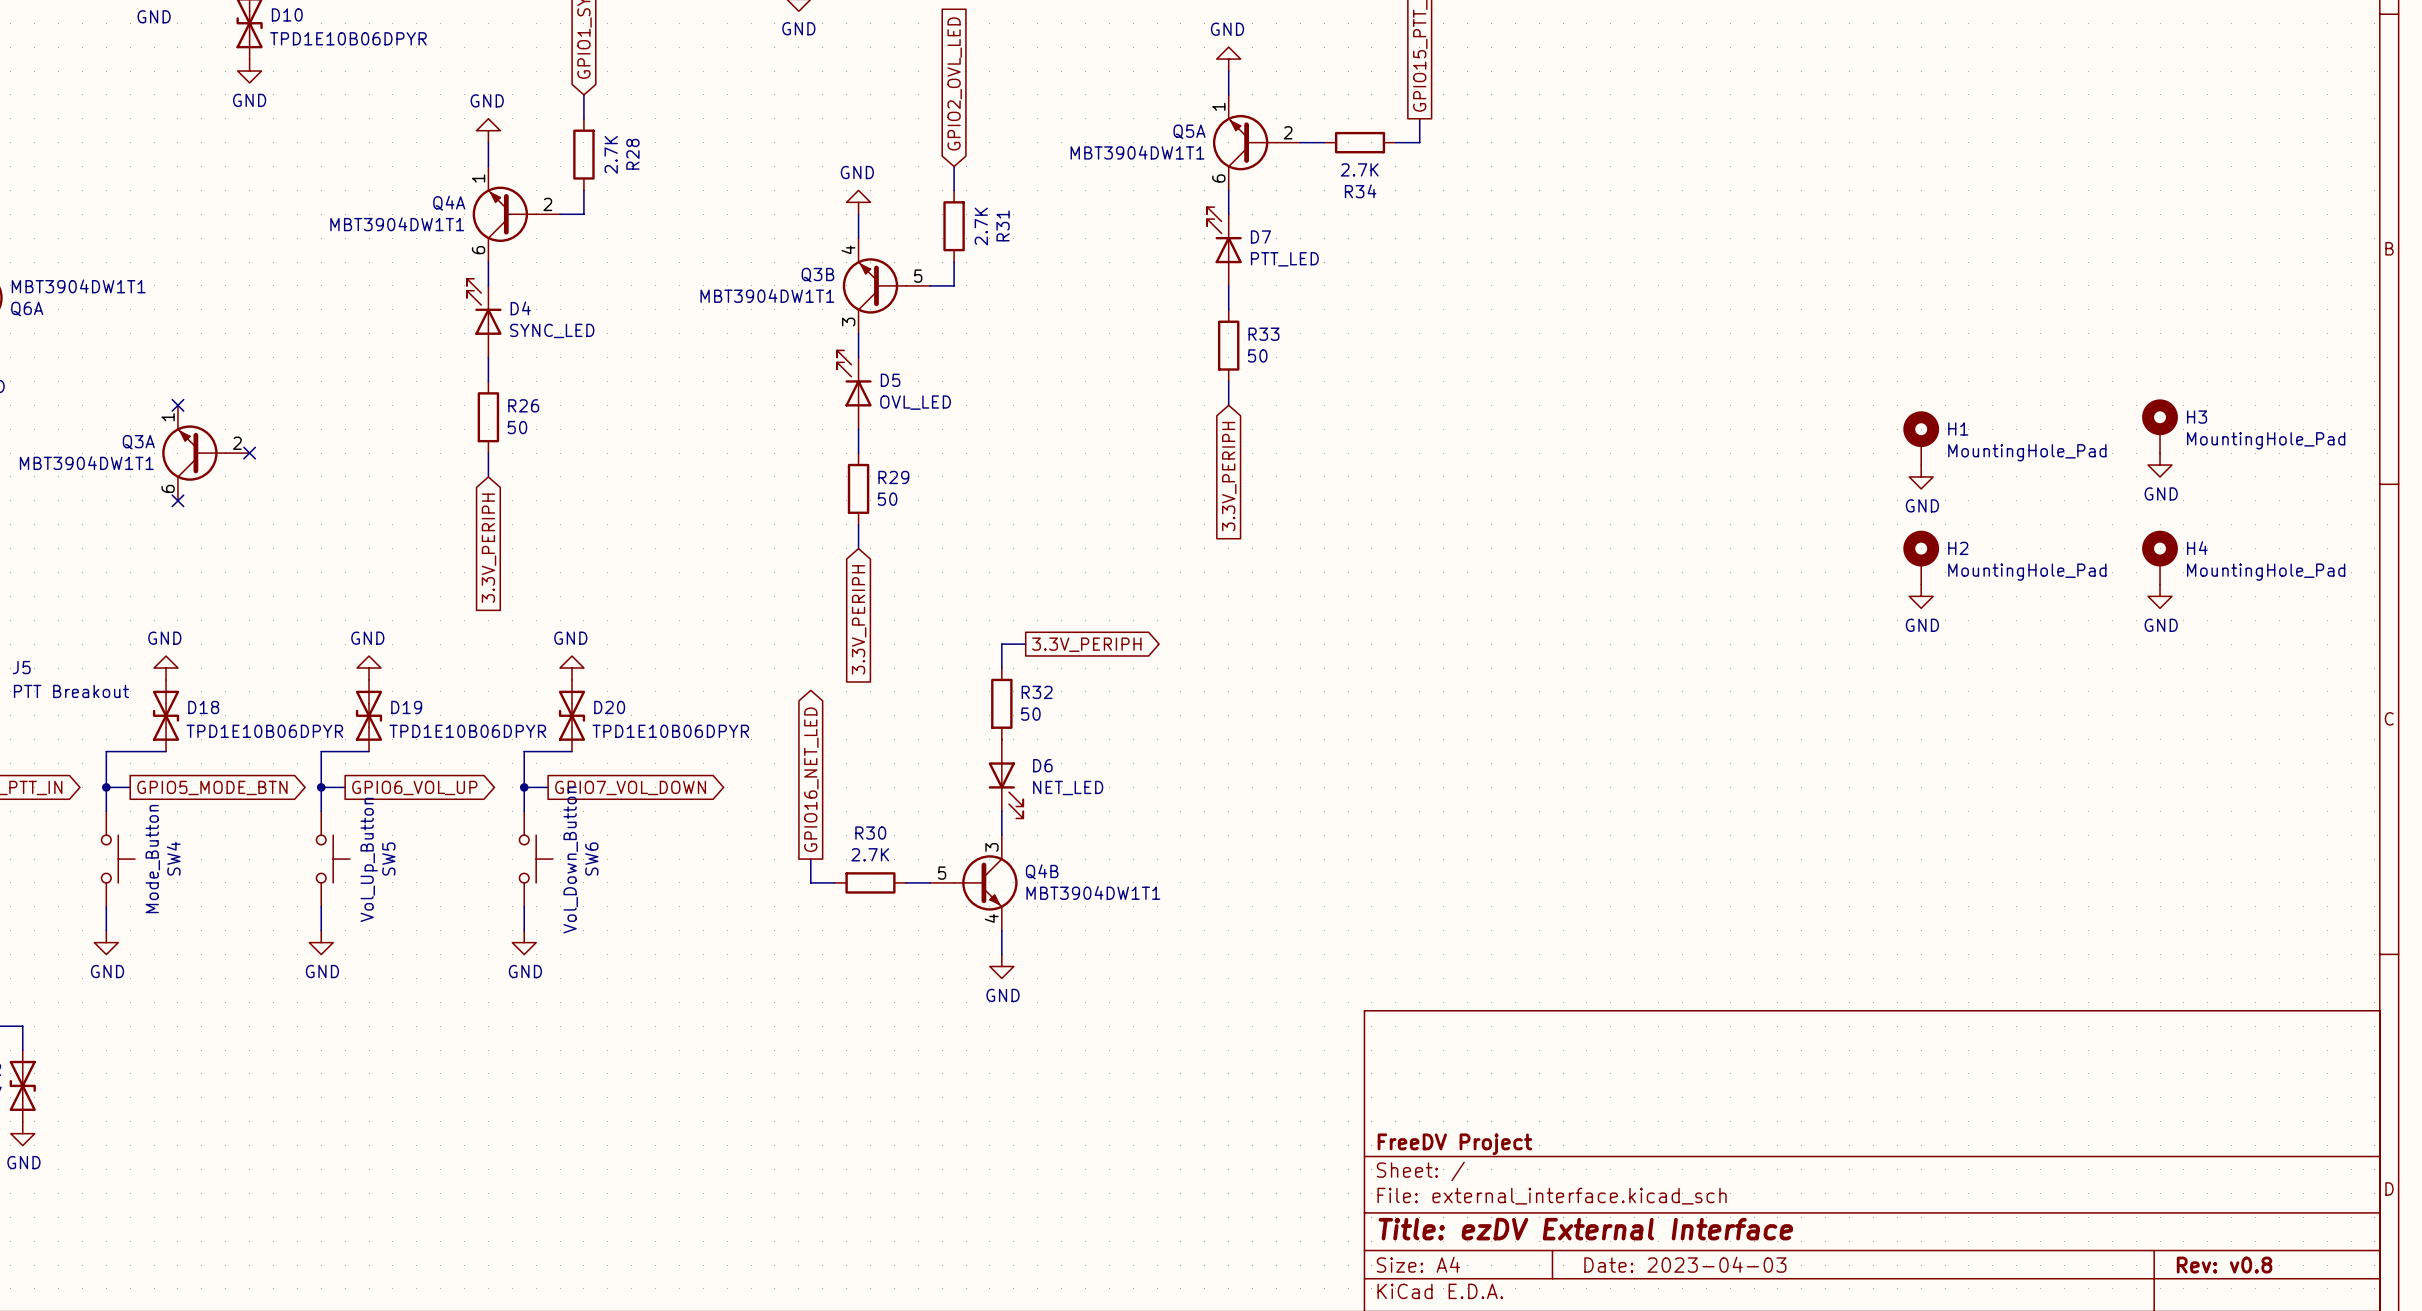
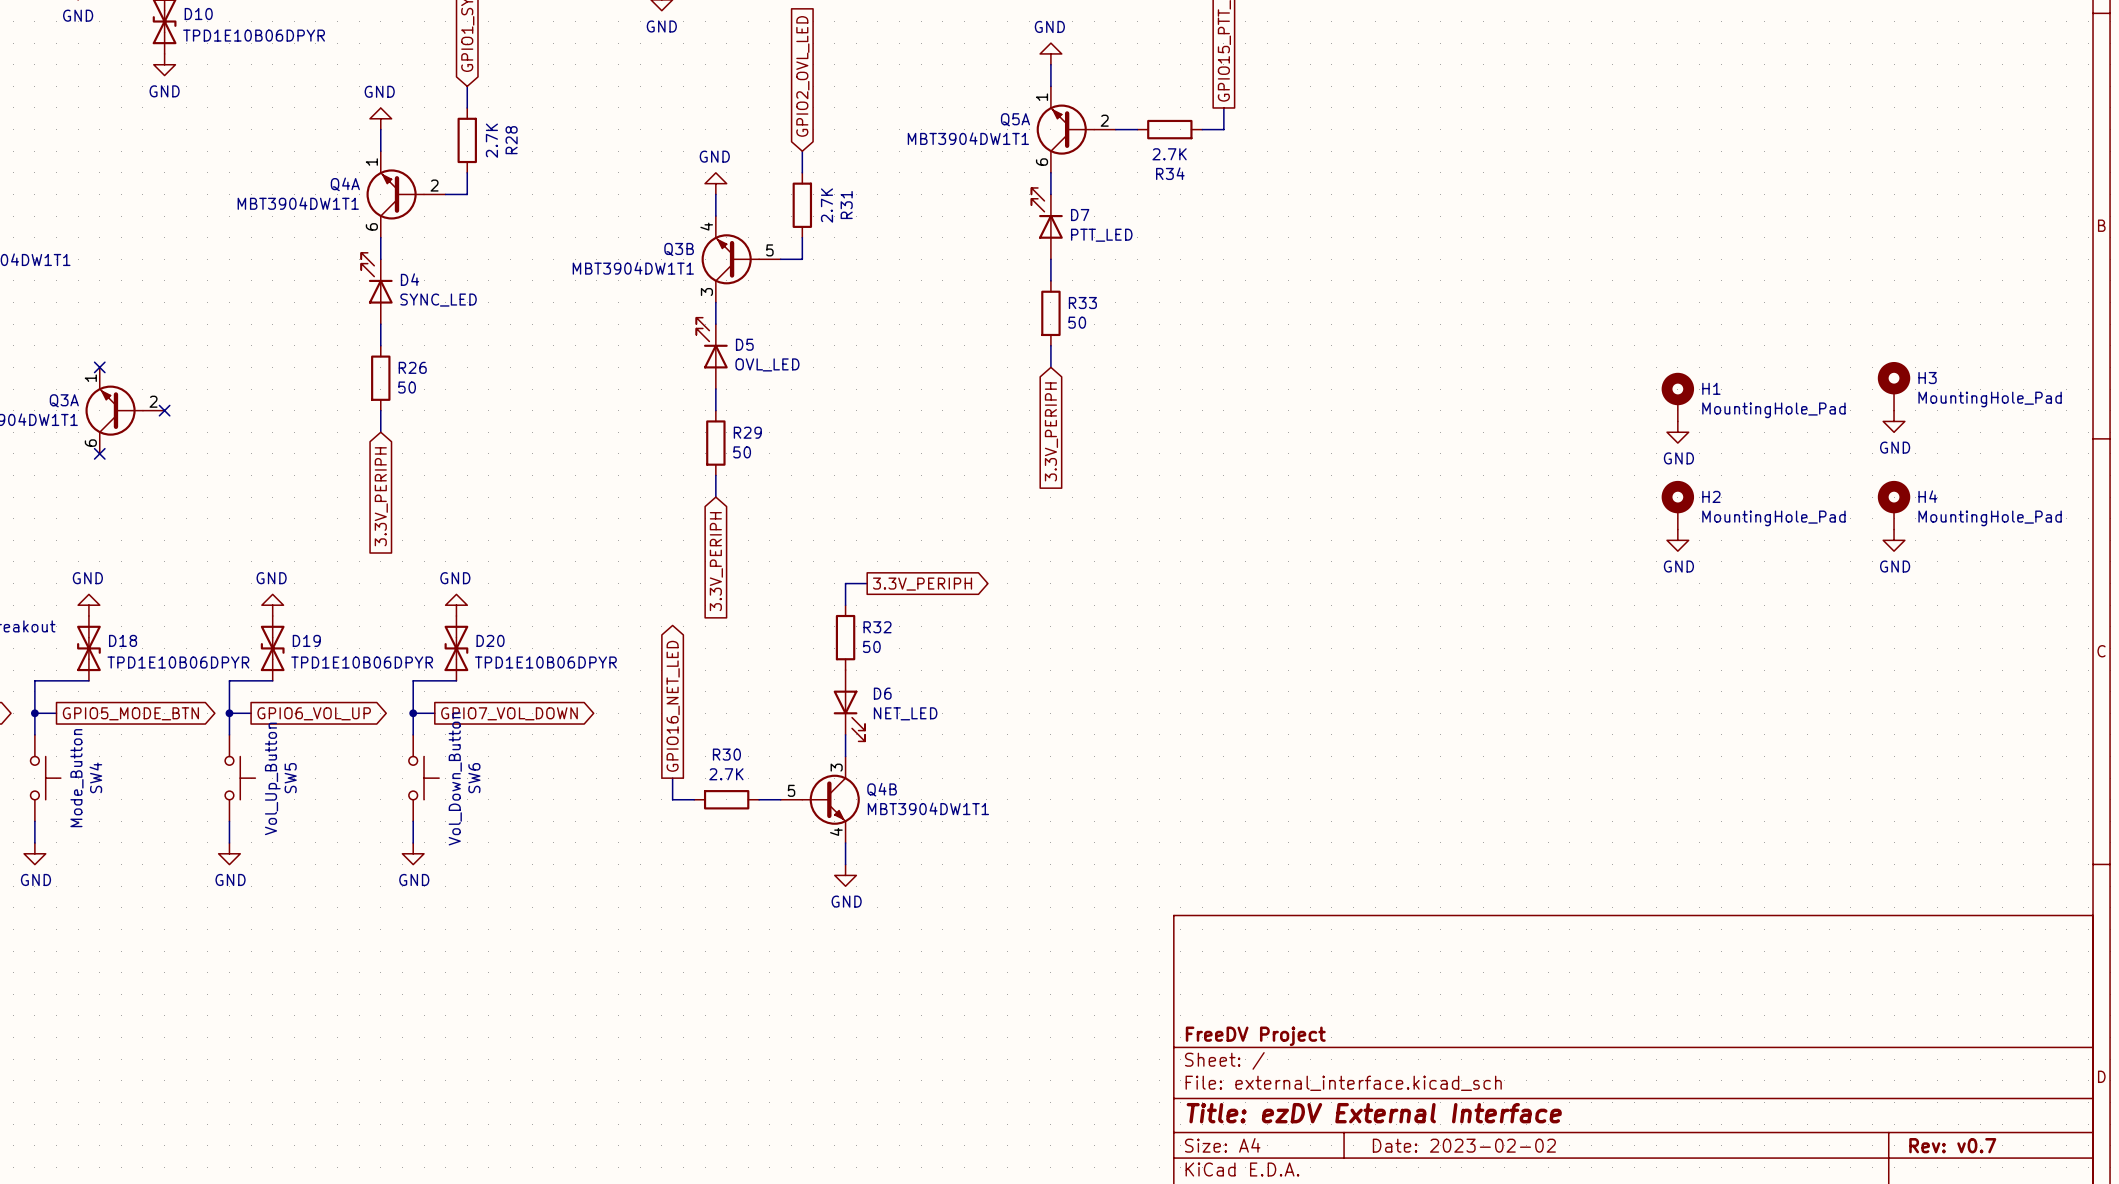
title block: Date: 2023-04-03 (1685, 1264) -> Date: 2023-02-02 (1464, 1145)
title block: Rev: v0.8 (2224, 1265) -> Rev: v0.7 (1952, 1145)

